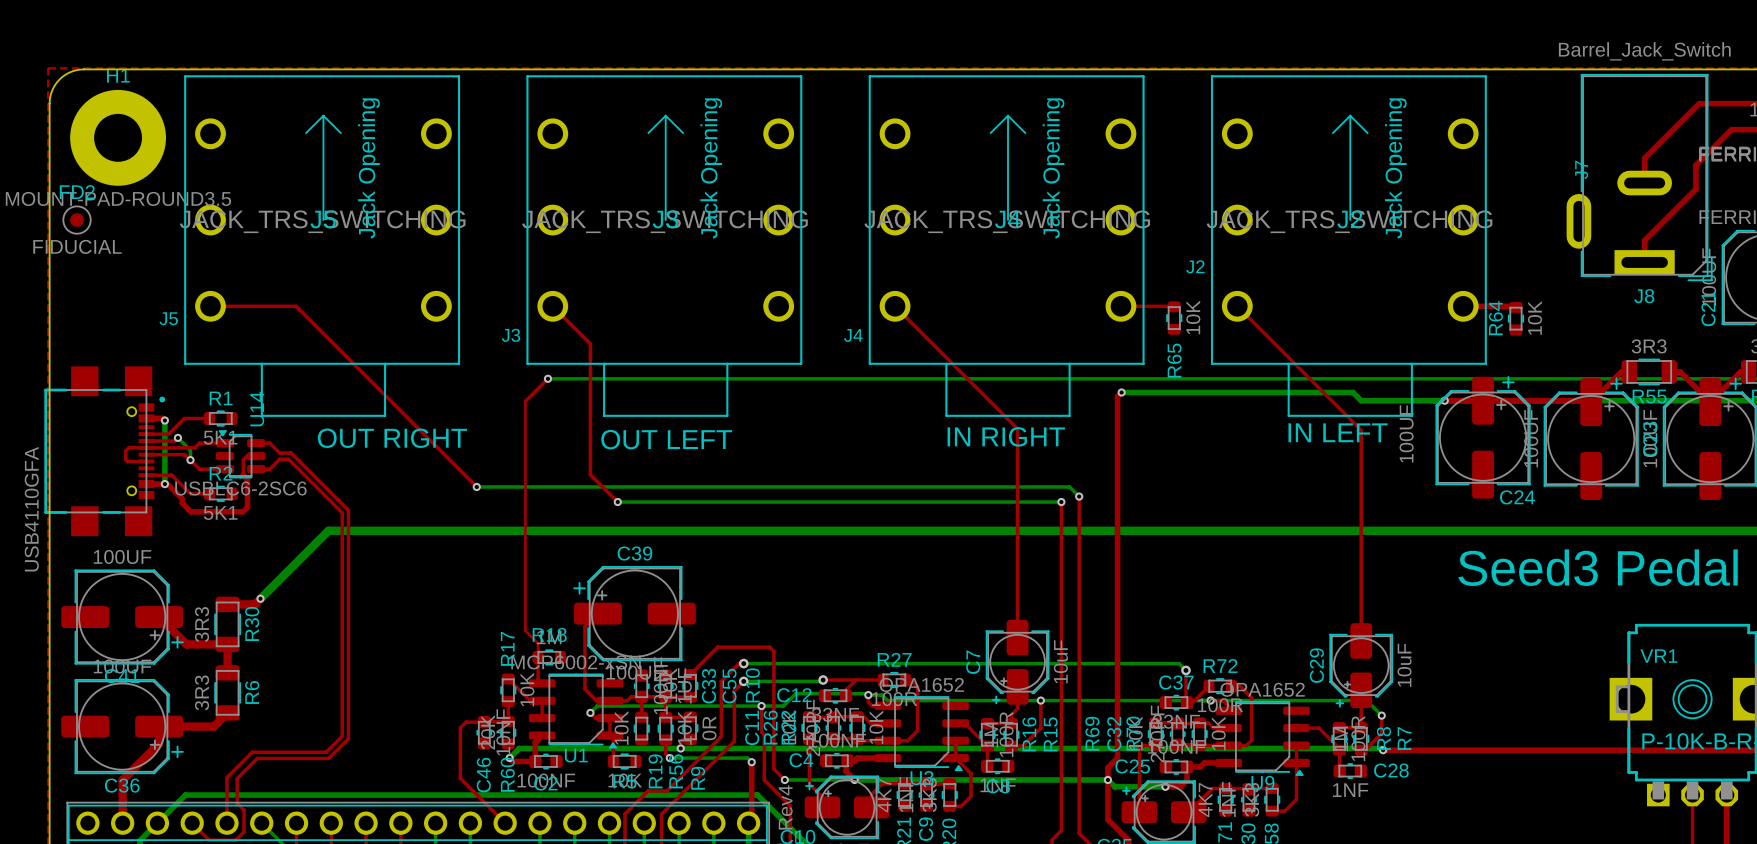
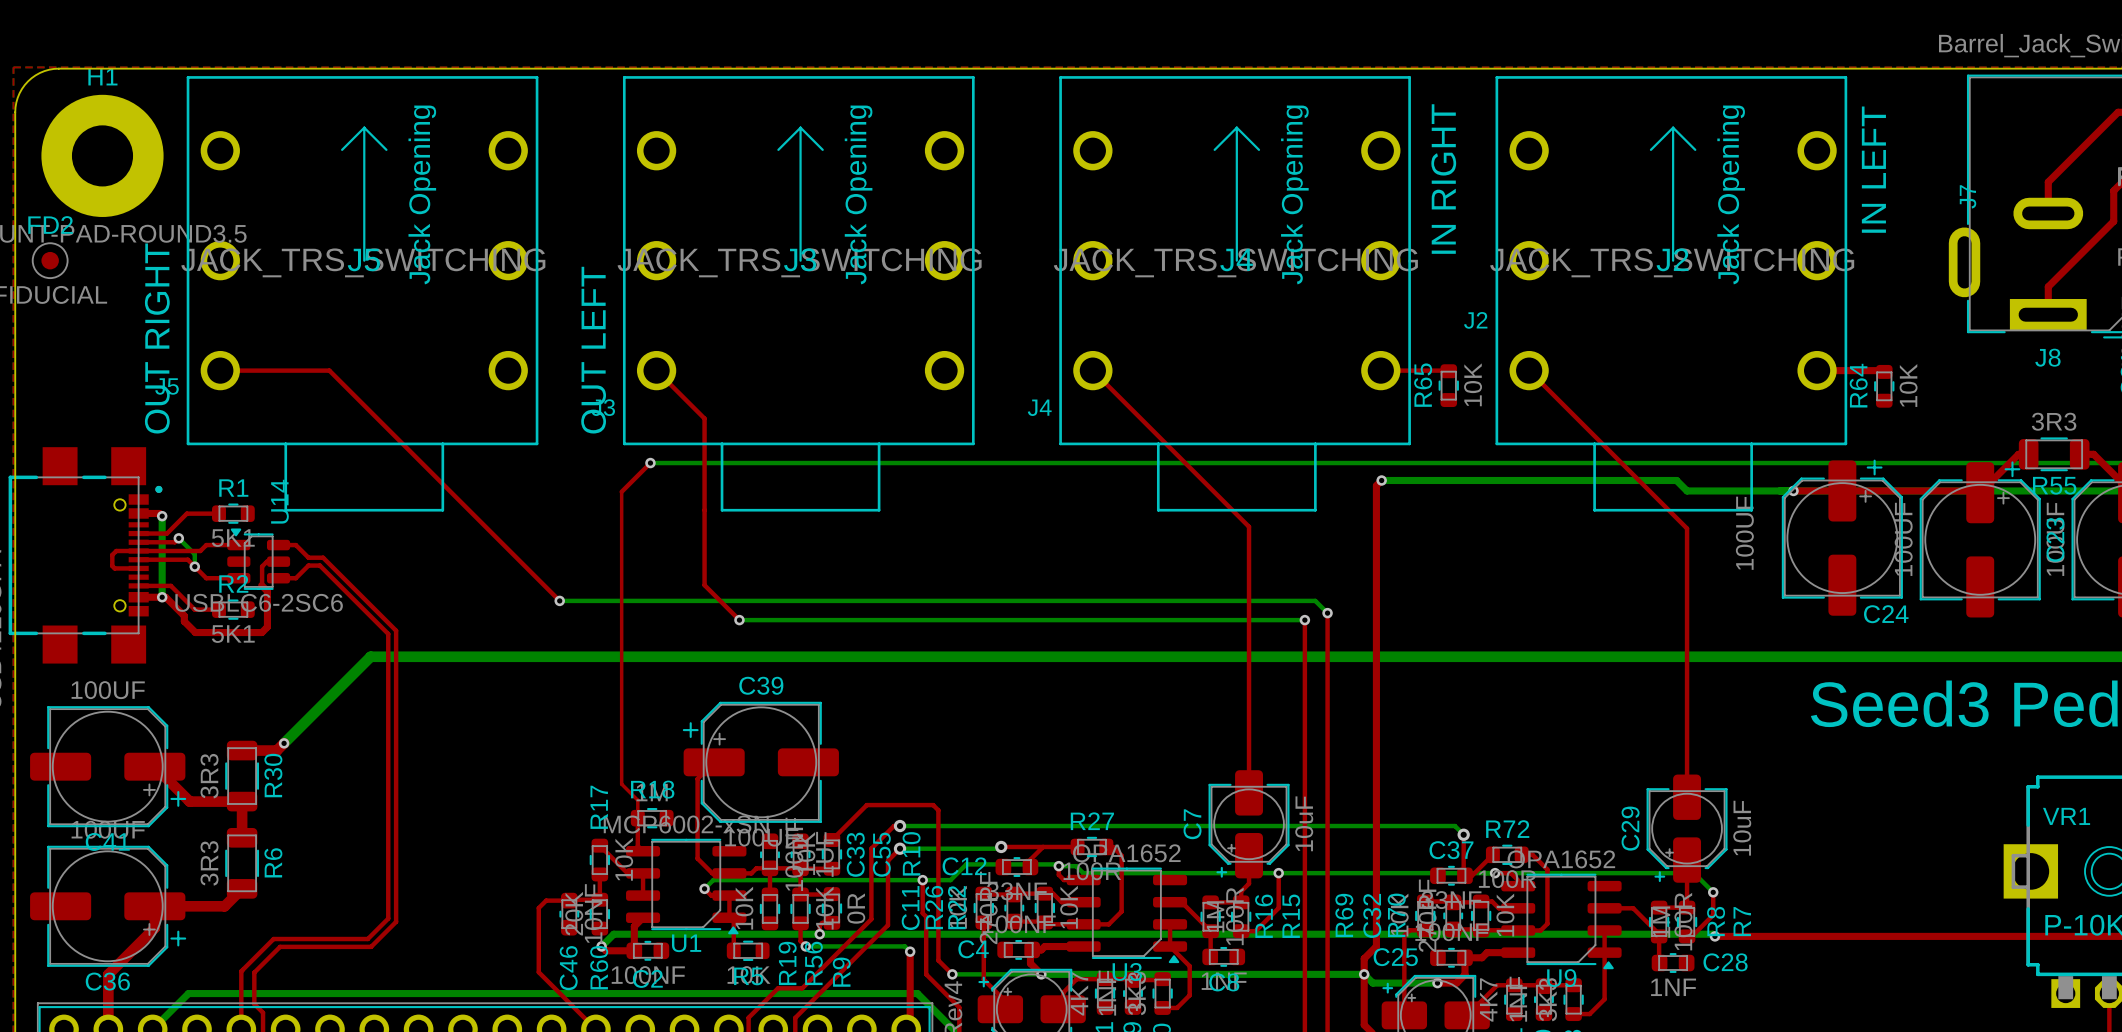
R65 name position: R65 (1174, 360) -> R65 (1423, 385)
text rotation: 0° (1337, 432) -> 90° counterclockwise (1873, 169)
text position: IN LEFT (1337, 432) -> IN LEFT (1873, 169)
text rotation: 0° (1006, 436) -> 90° counterclockwise (1443, 179)
text position: IN RIGHT (1006, 436) -> IN RIGHT (1443, 179)
text rotation: 0° (392, 438) -> 90° counterclockwise (157, 338)
text position: OUT RIGHT (392, 438) -> OUT RIGHT (157, 338)
text rotation: 0° (666, 439) -> 90° counterclockwise (593, 350)
text position: OUT LEFT (666, 439) -> OUT LEFT (593, 350)

